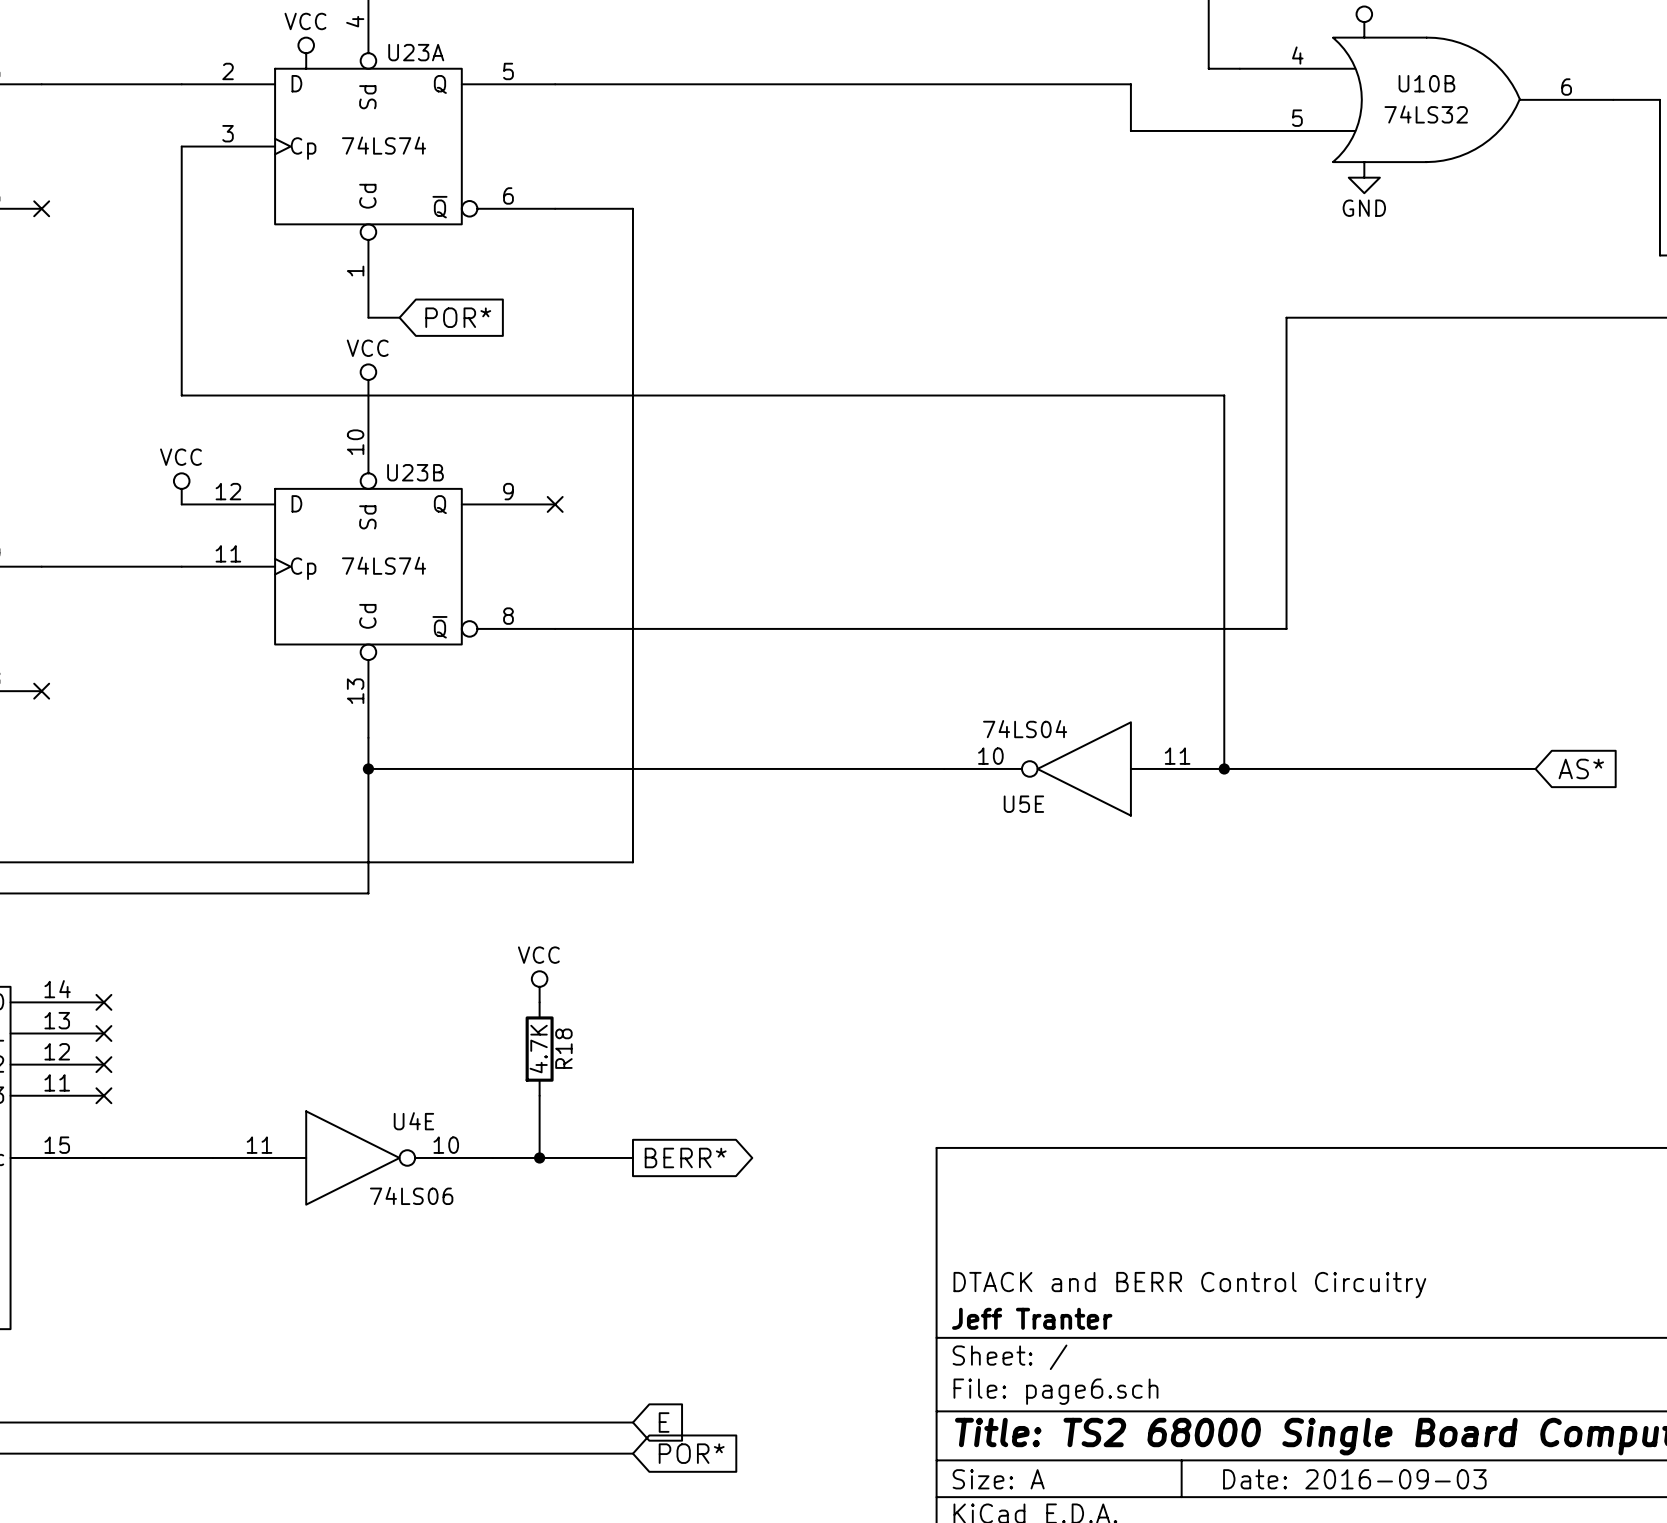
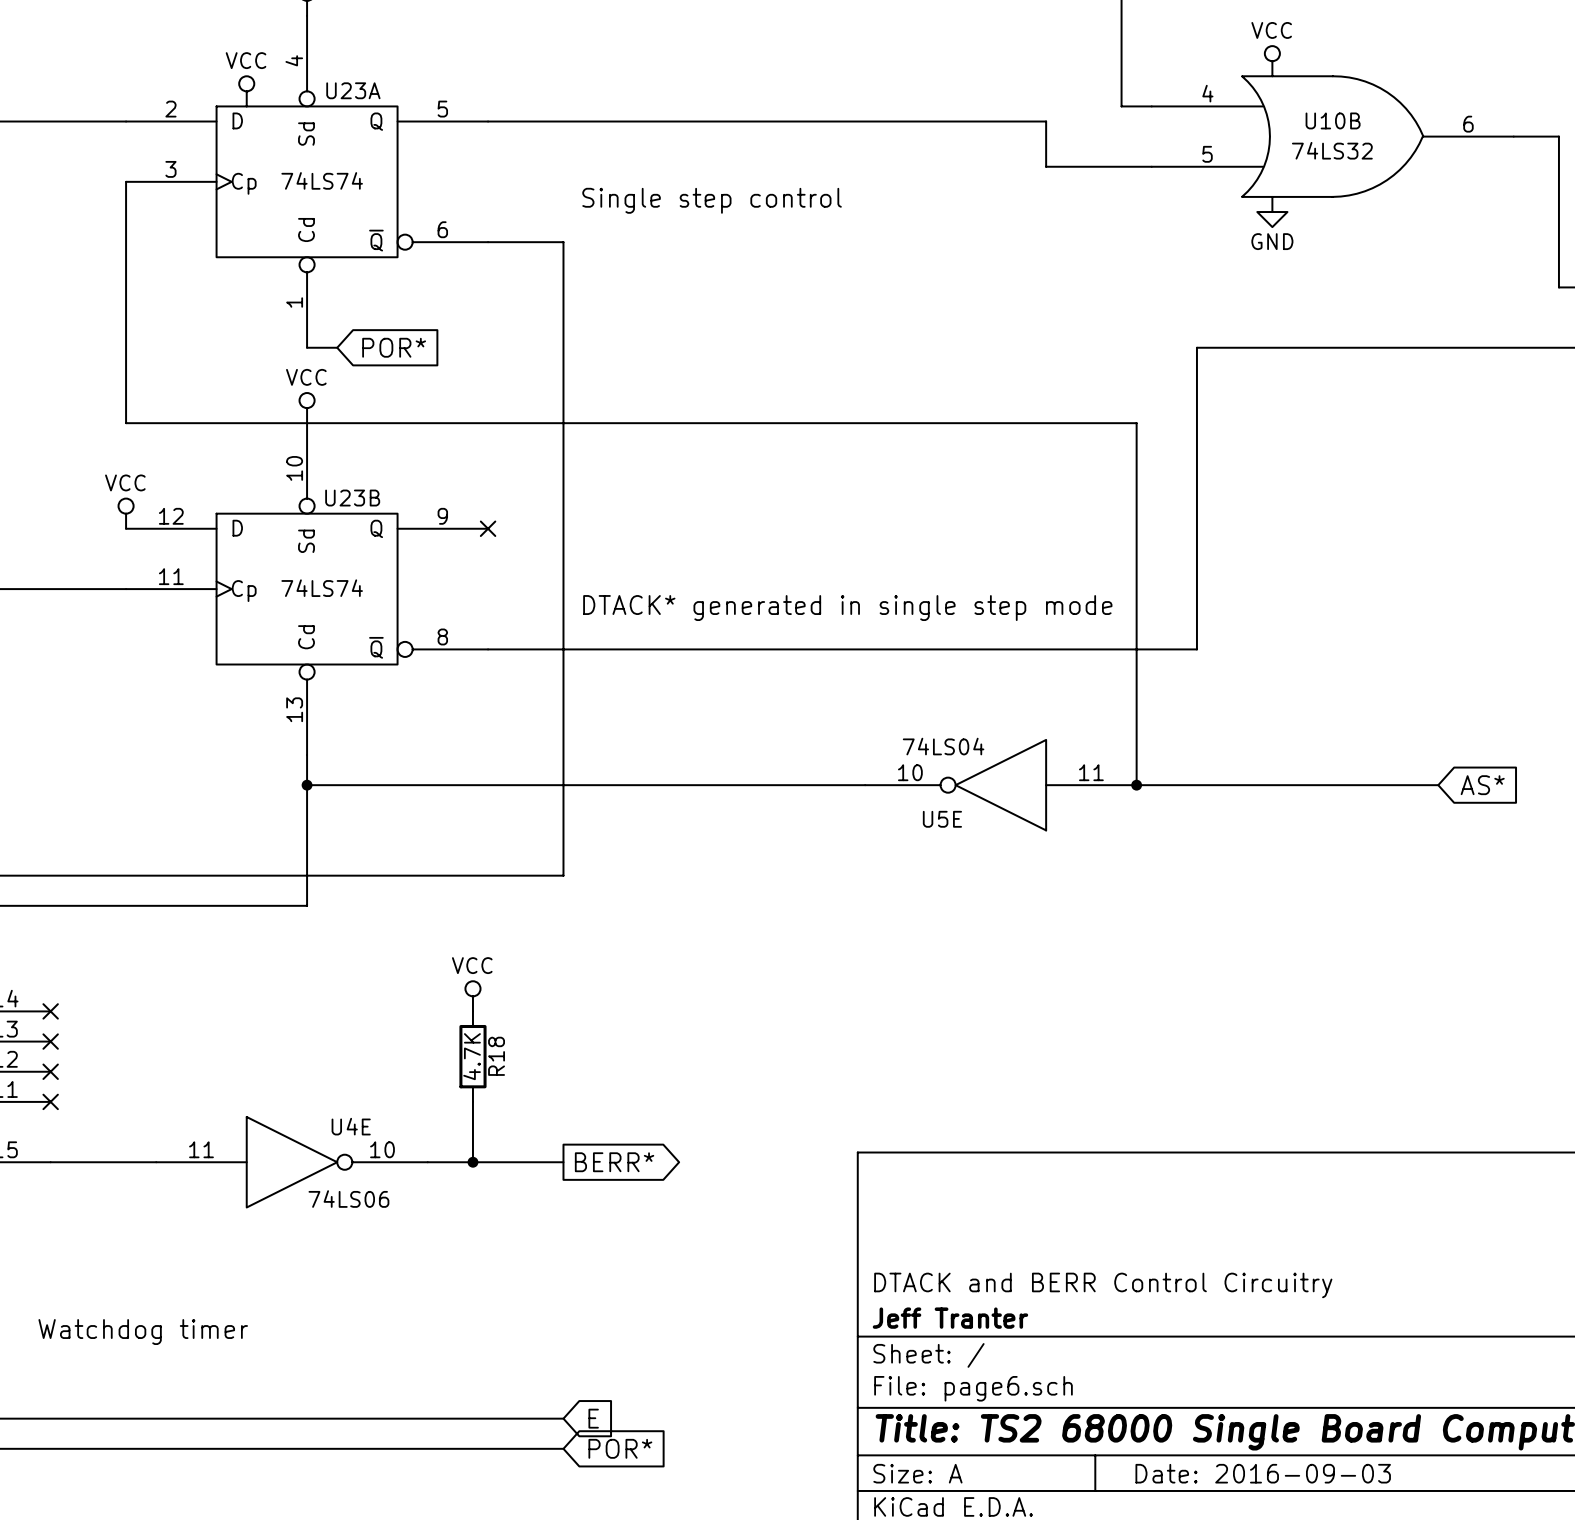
text: none -> Single step control (712, 200)
text: none -> DTACK* generated in single step mode (847, 608)
text: none -> Watchdog timer (143, 1332)

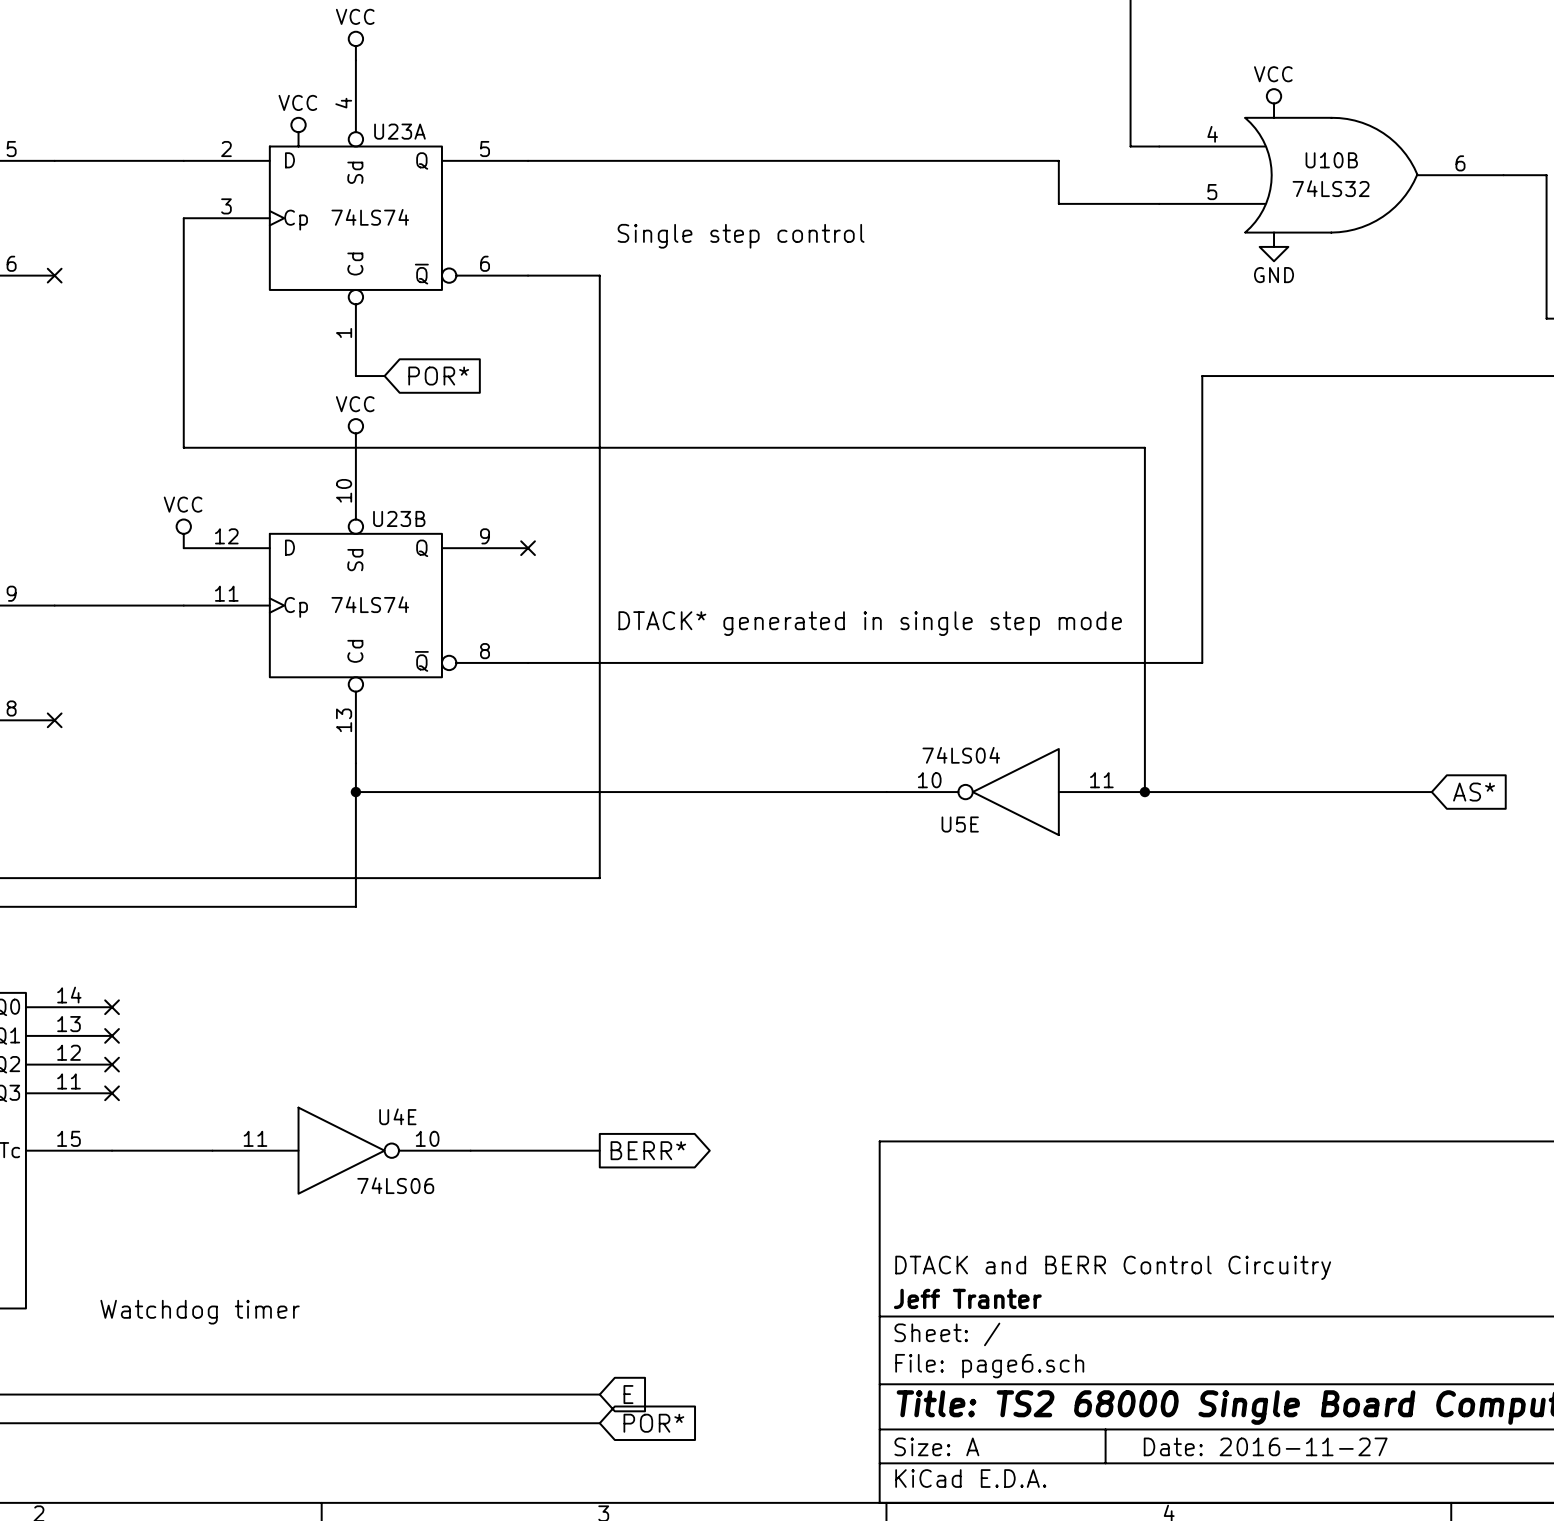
power symbol: VCC (472, 996) -> none
R18: 4.7K (472, 1056) -> none
wire: (472, 1101) (472, 1162) -> none
junction: (472, 1162) -> none
title block: Date: 2016-09-03 (1263, 1473) -> Date: 2016-11-27 (1265, 1446)

